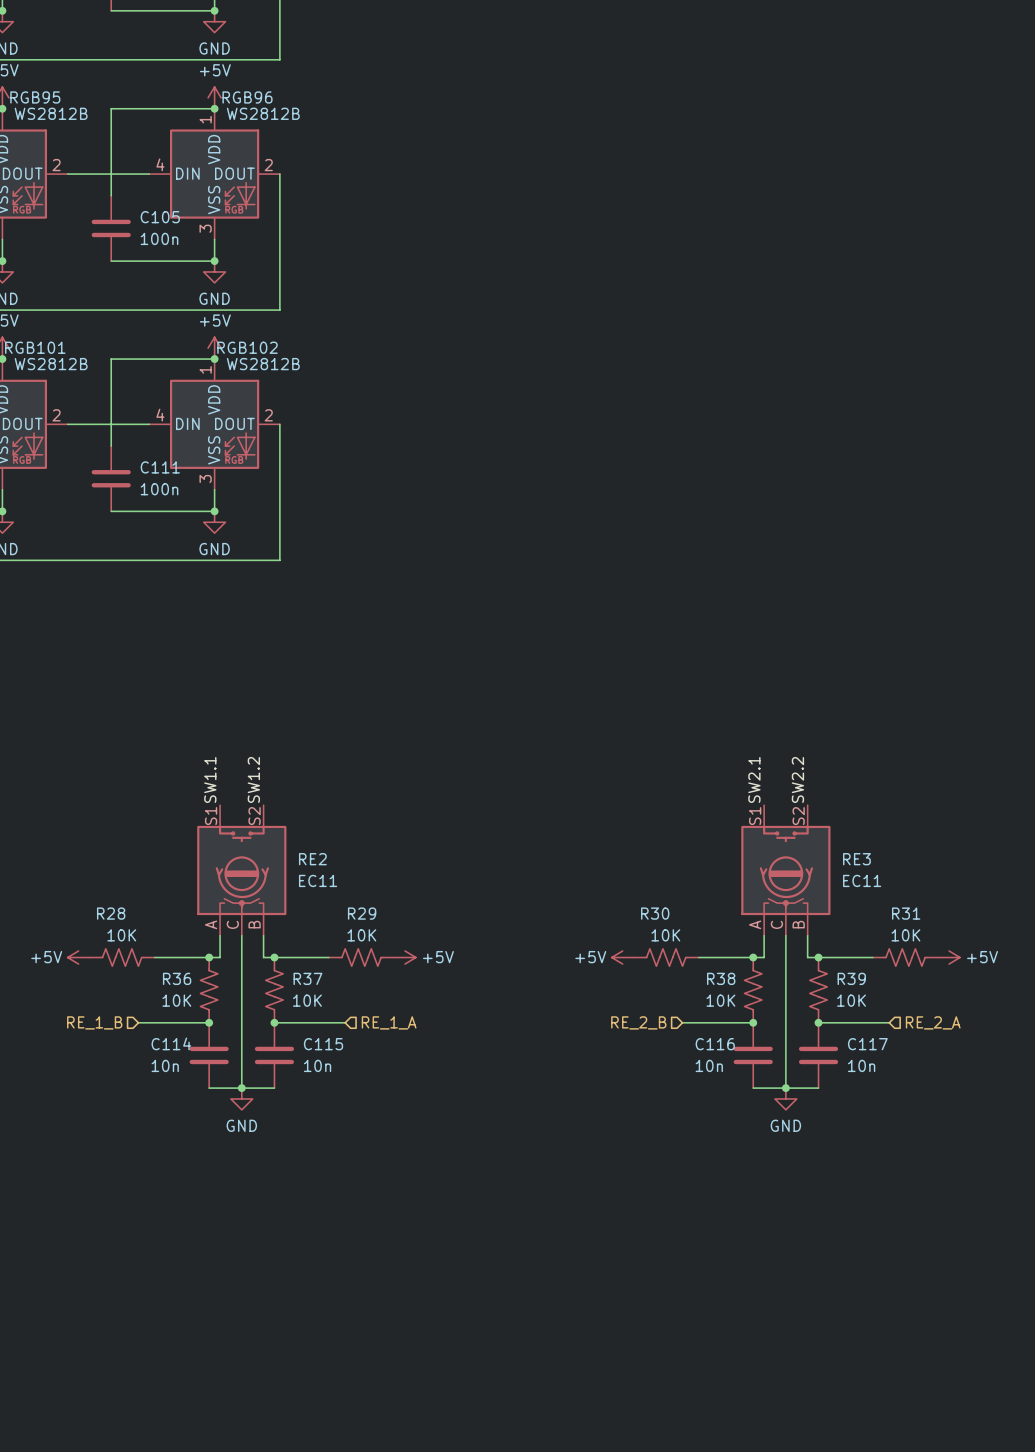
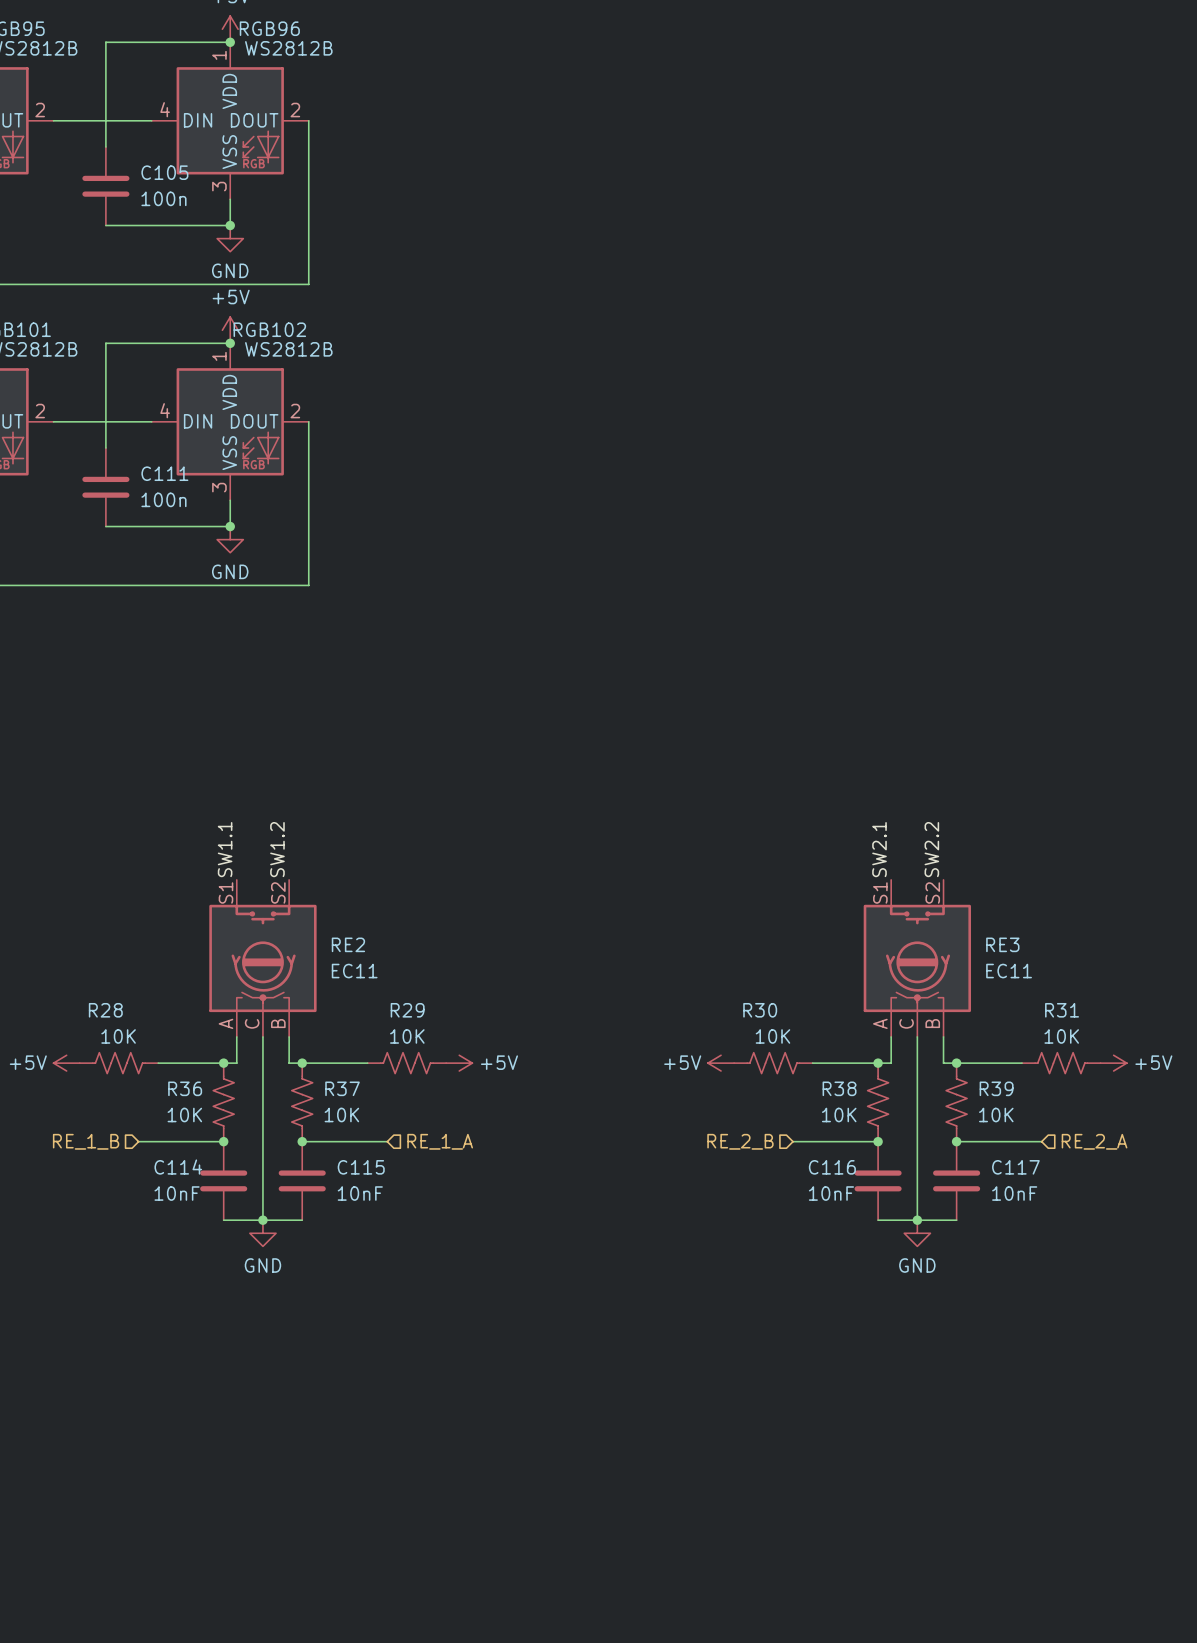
C114 value: 10n (165, 1065) -> 10nF (177, 1193)
C115 value: 10n (317, 1065) -> 10nF (360, 1193)
C116 value: 10n (709, 1065) -> 10nF (831, 1193)
C117 value: 10n (861, 1065) -> 10nF (1014, 1193)

